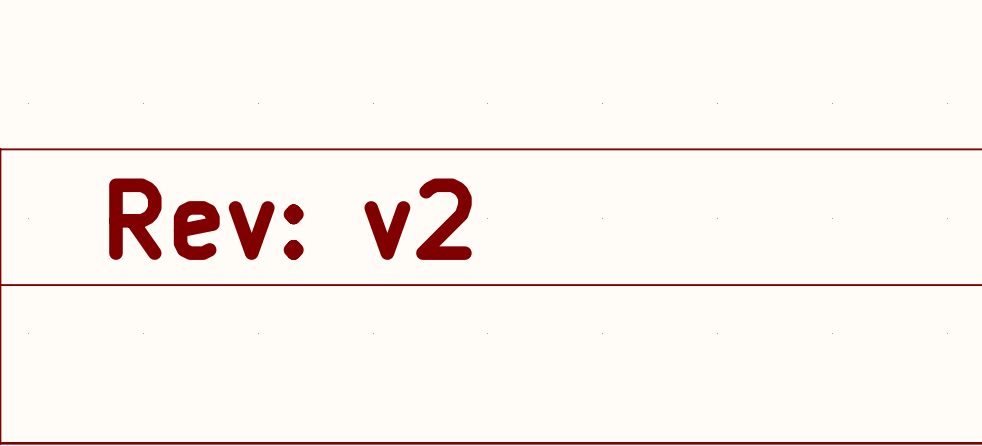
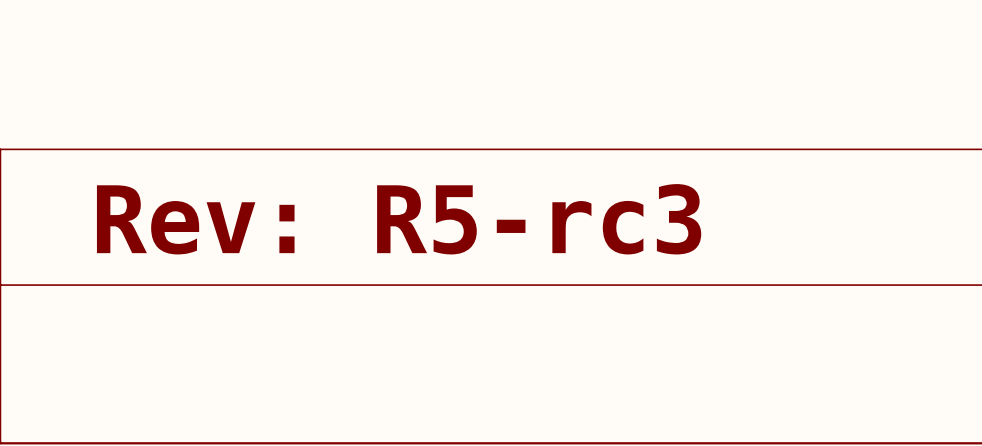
title block: Rev: v2 (290, 219) -> Rev: R5-rc3 (399, 219)

